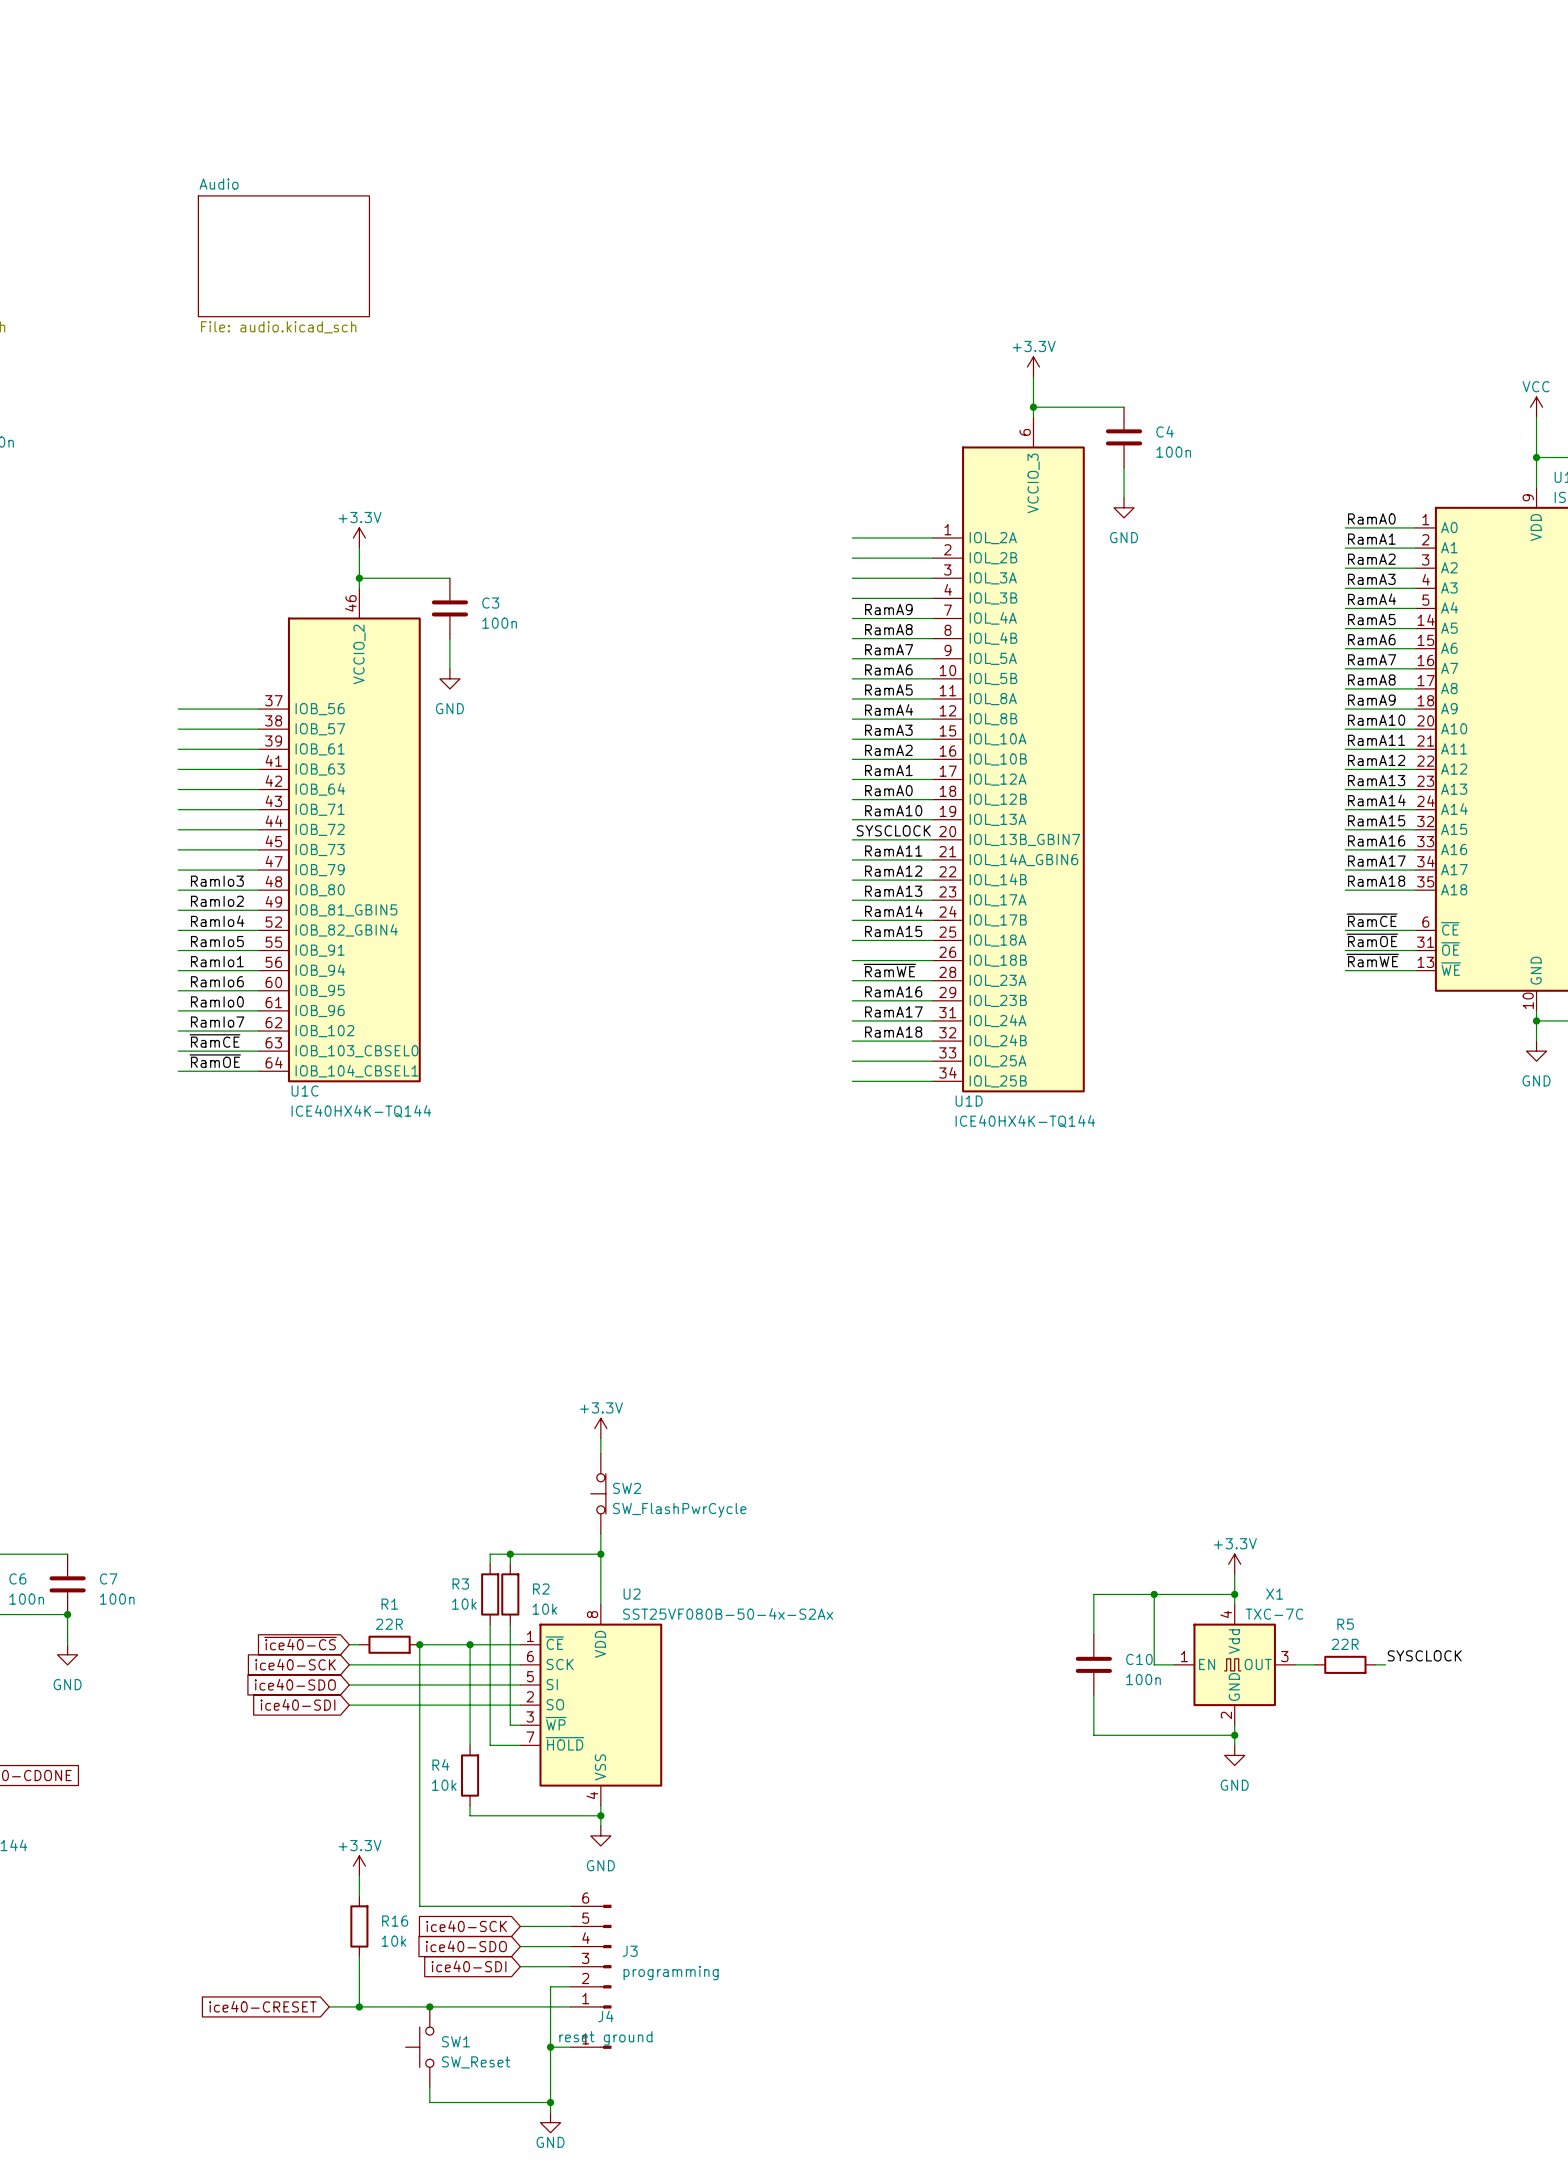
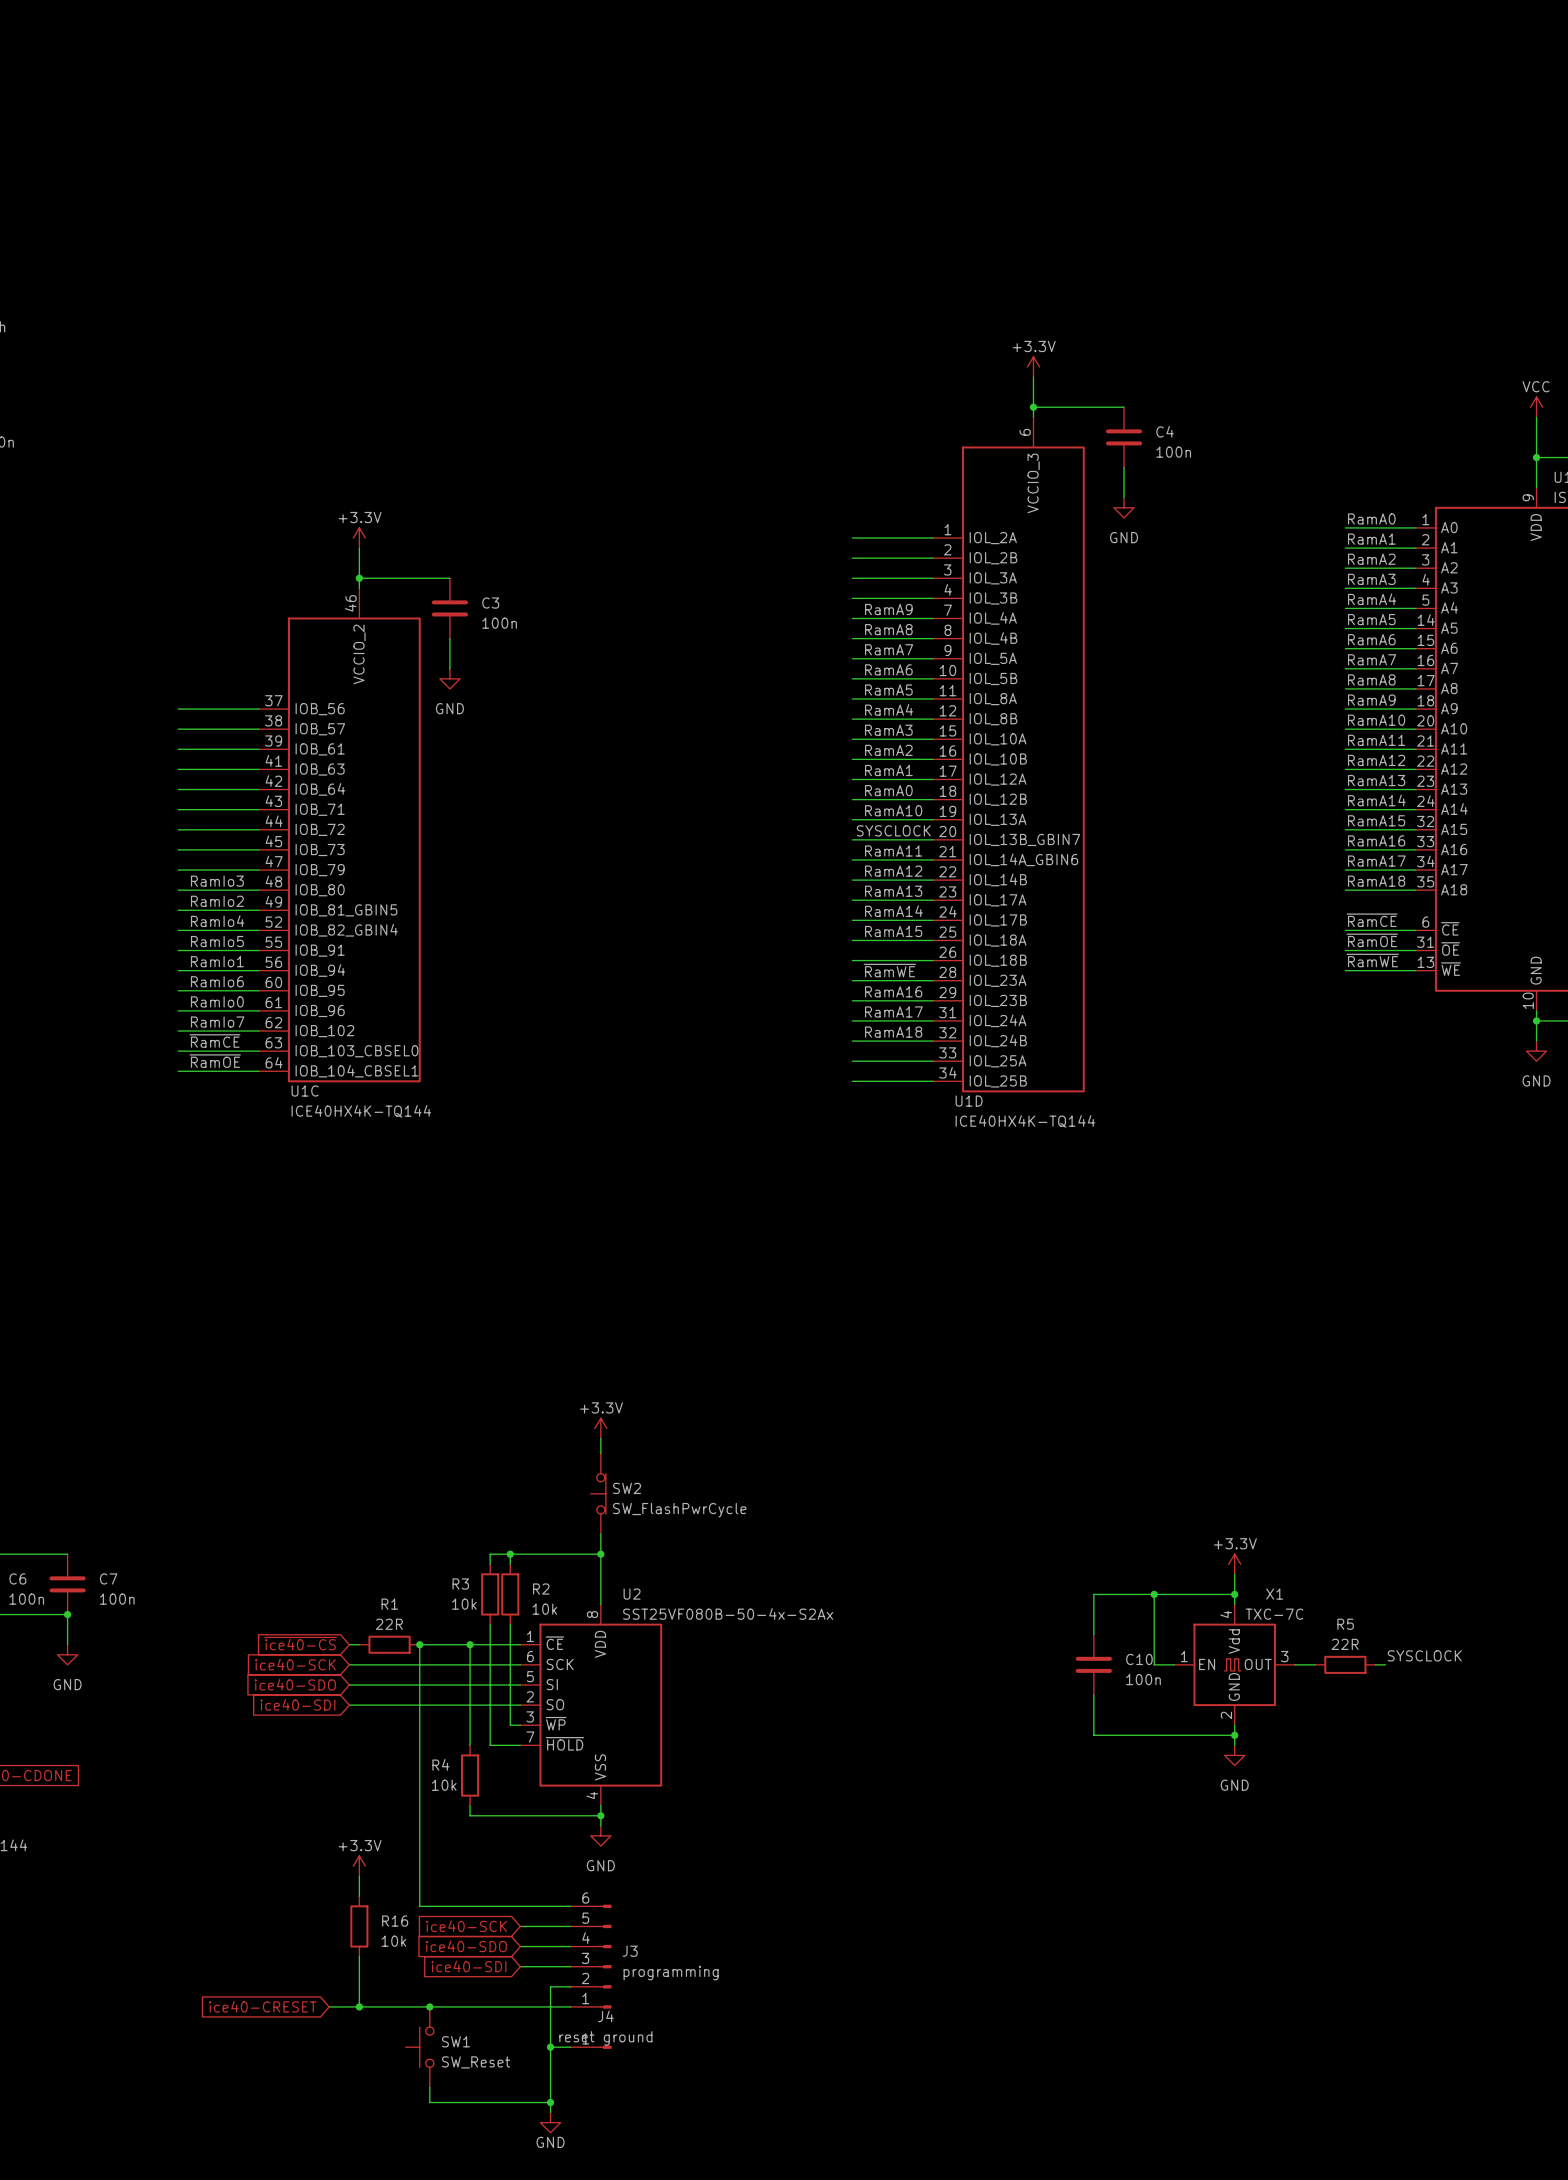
sheet Audio: File: audio.kicad_sch (283, 256) -> none

